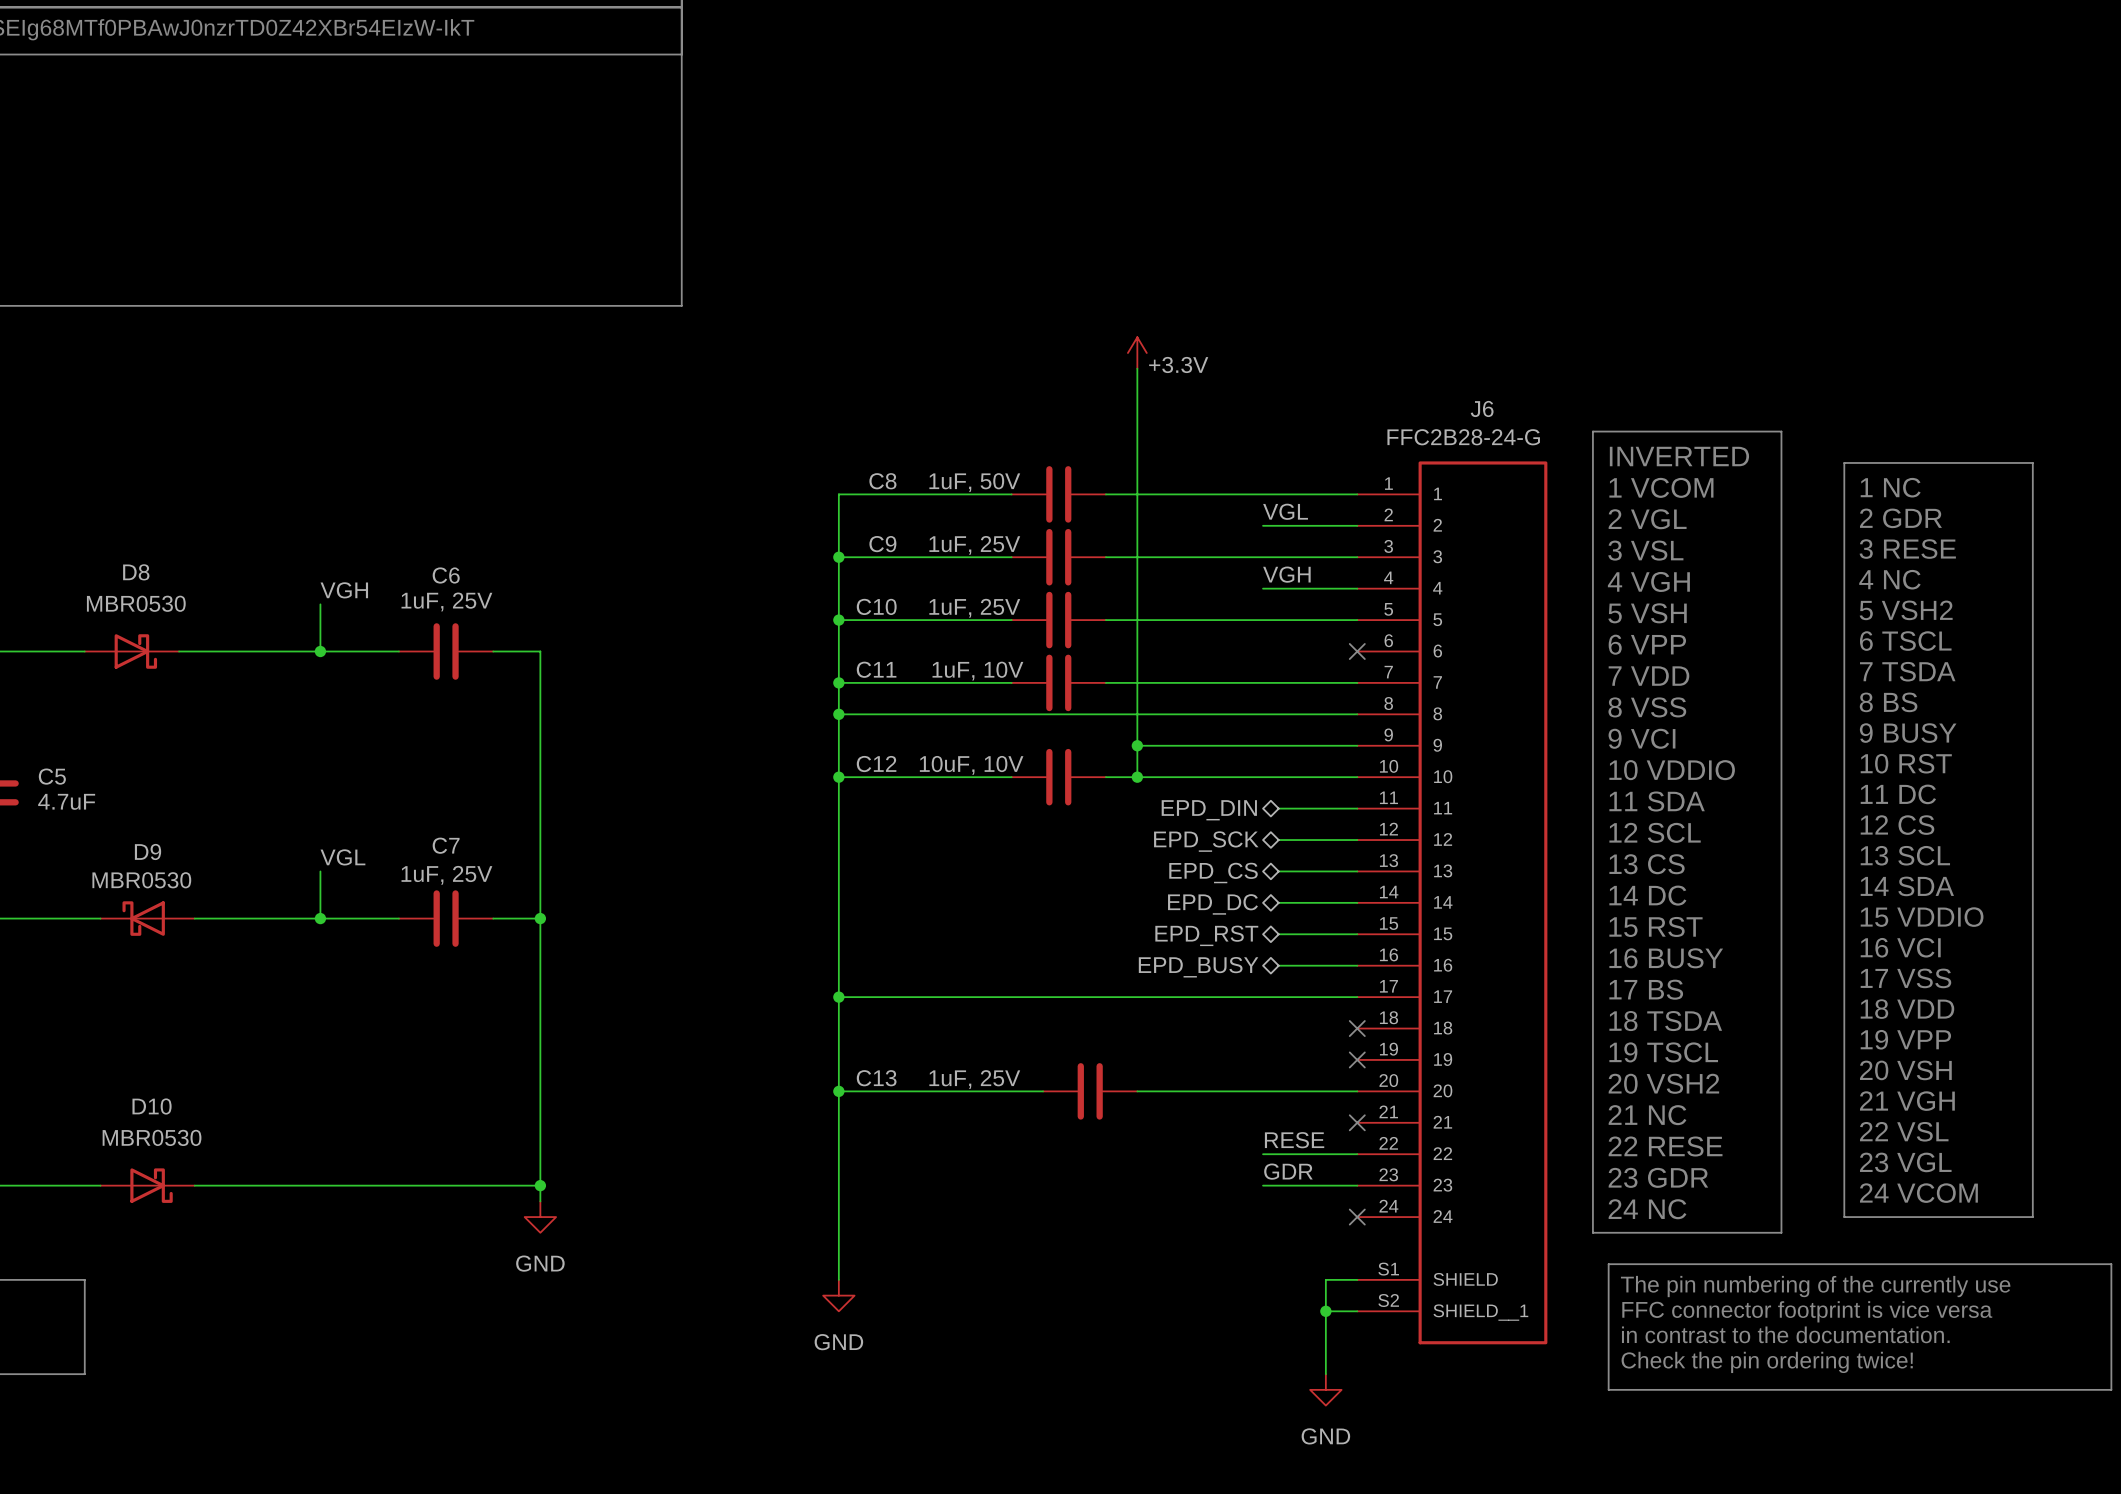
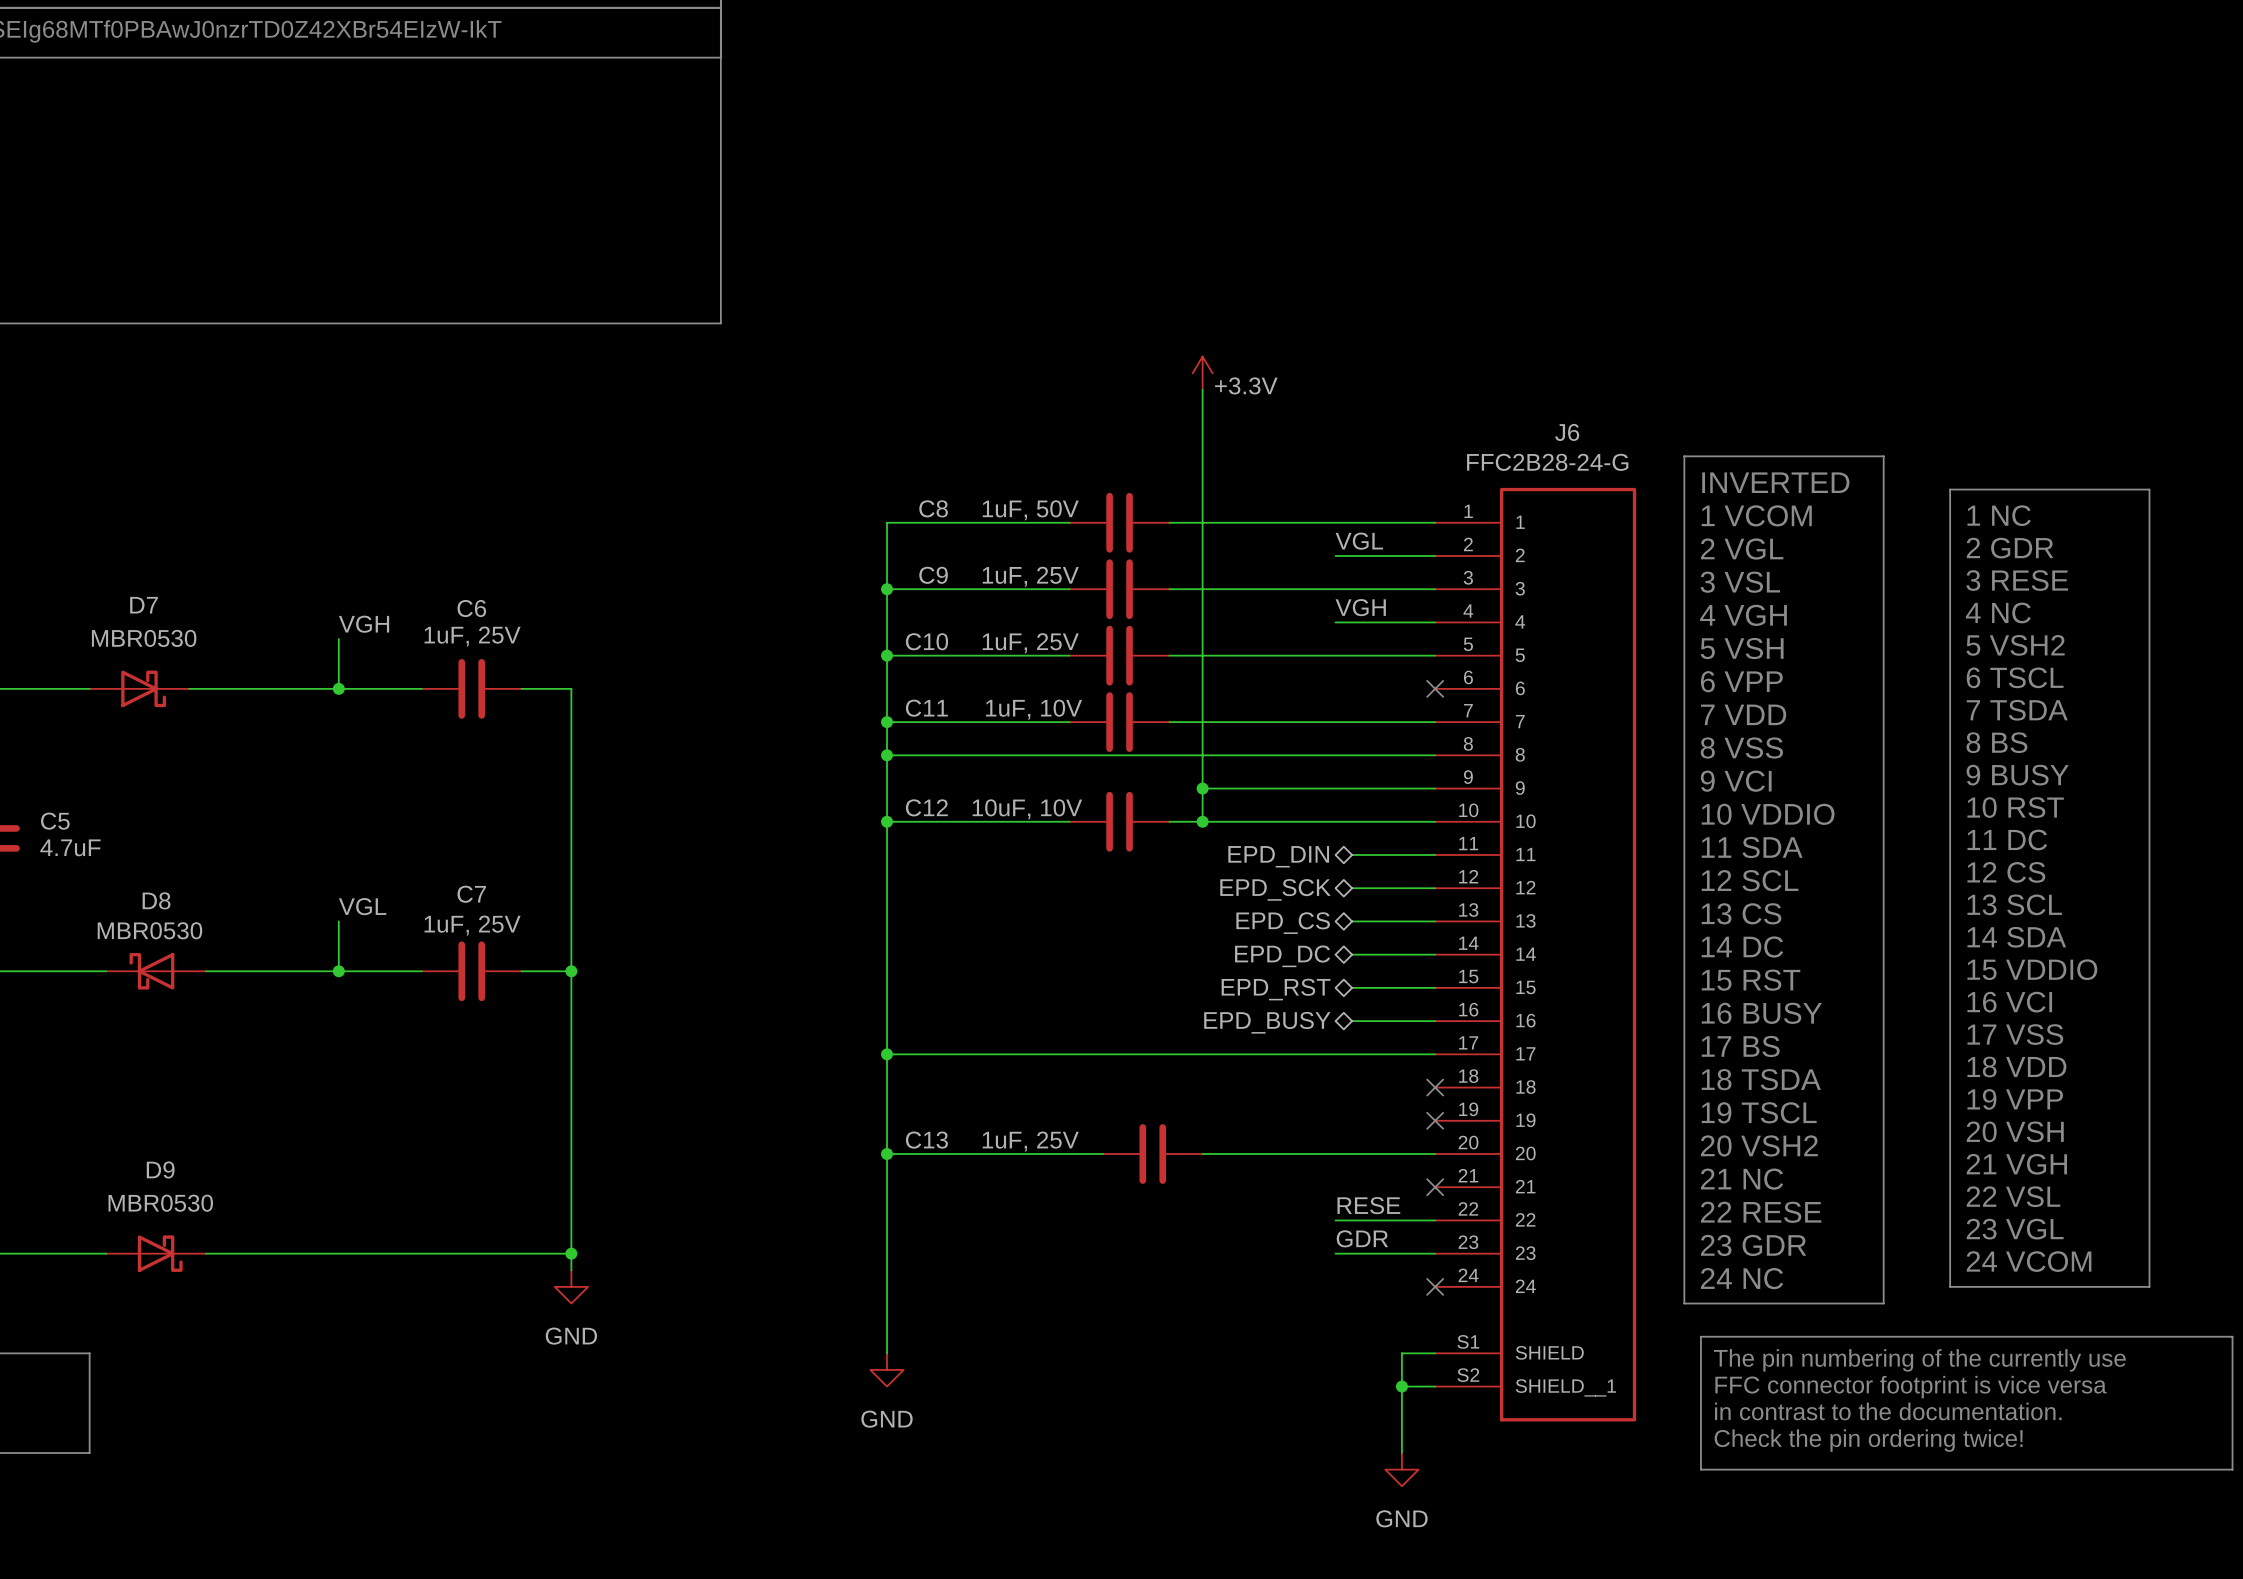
D8 name: D8 (136, 572) -> D7 (144, 605)
D9 name: D9 (148, 851) -> D8 (156, 900)
D10 name: D10 (152, 1106) -> D9 (160, 1169)

